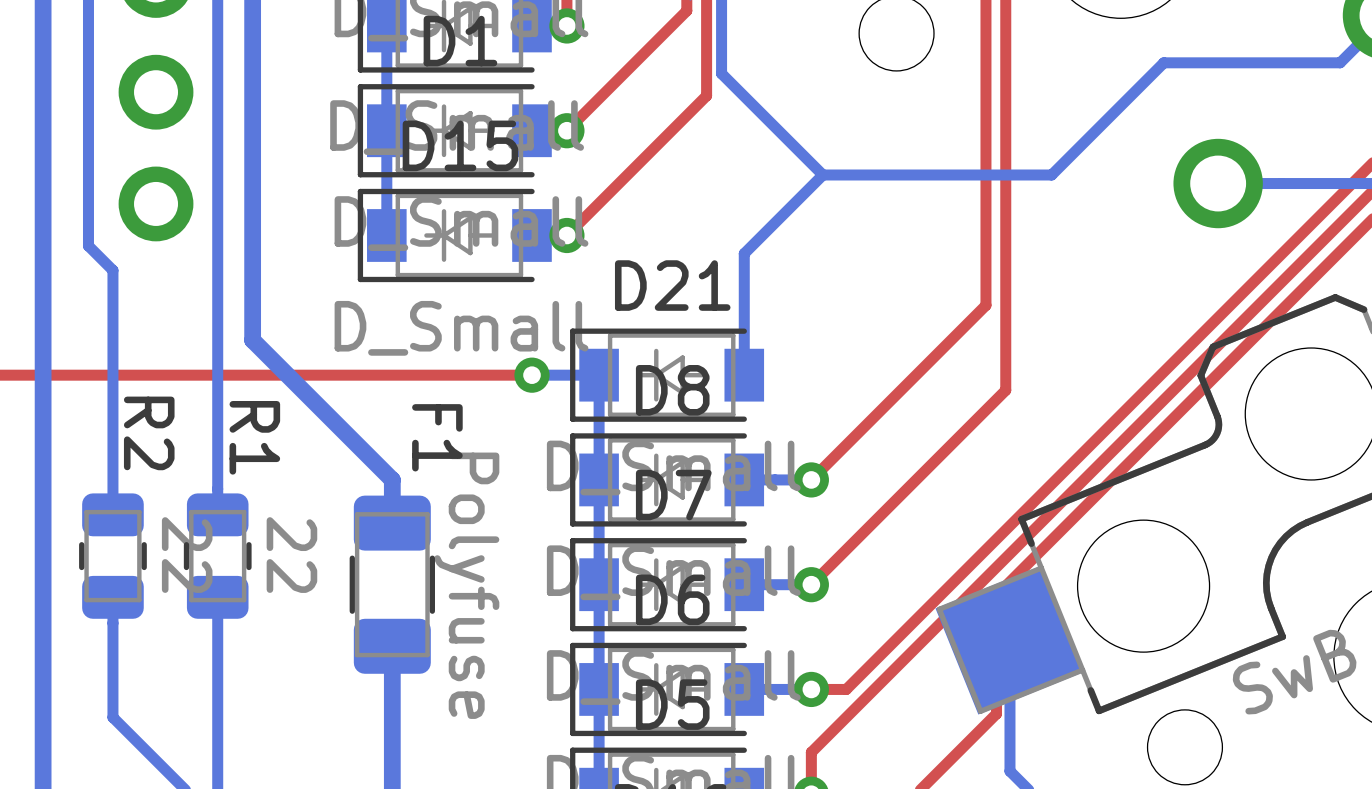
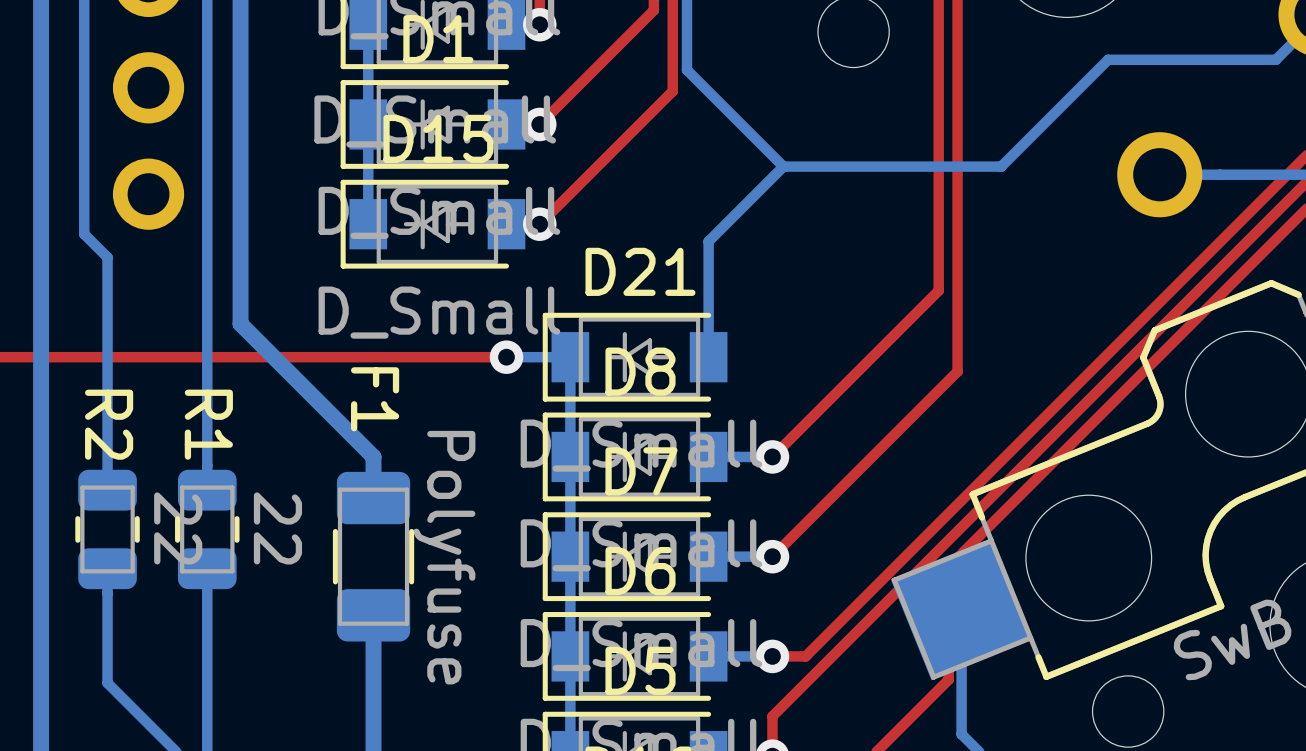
R2 name position: R2 (149, 433) -> R2 (109, 424)
R1 name position: R1 (254, 437) -> R1 (208, 424)
F1 name position: F1 (437, 437) -> F1 (375, 399)

